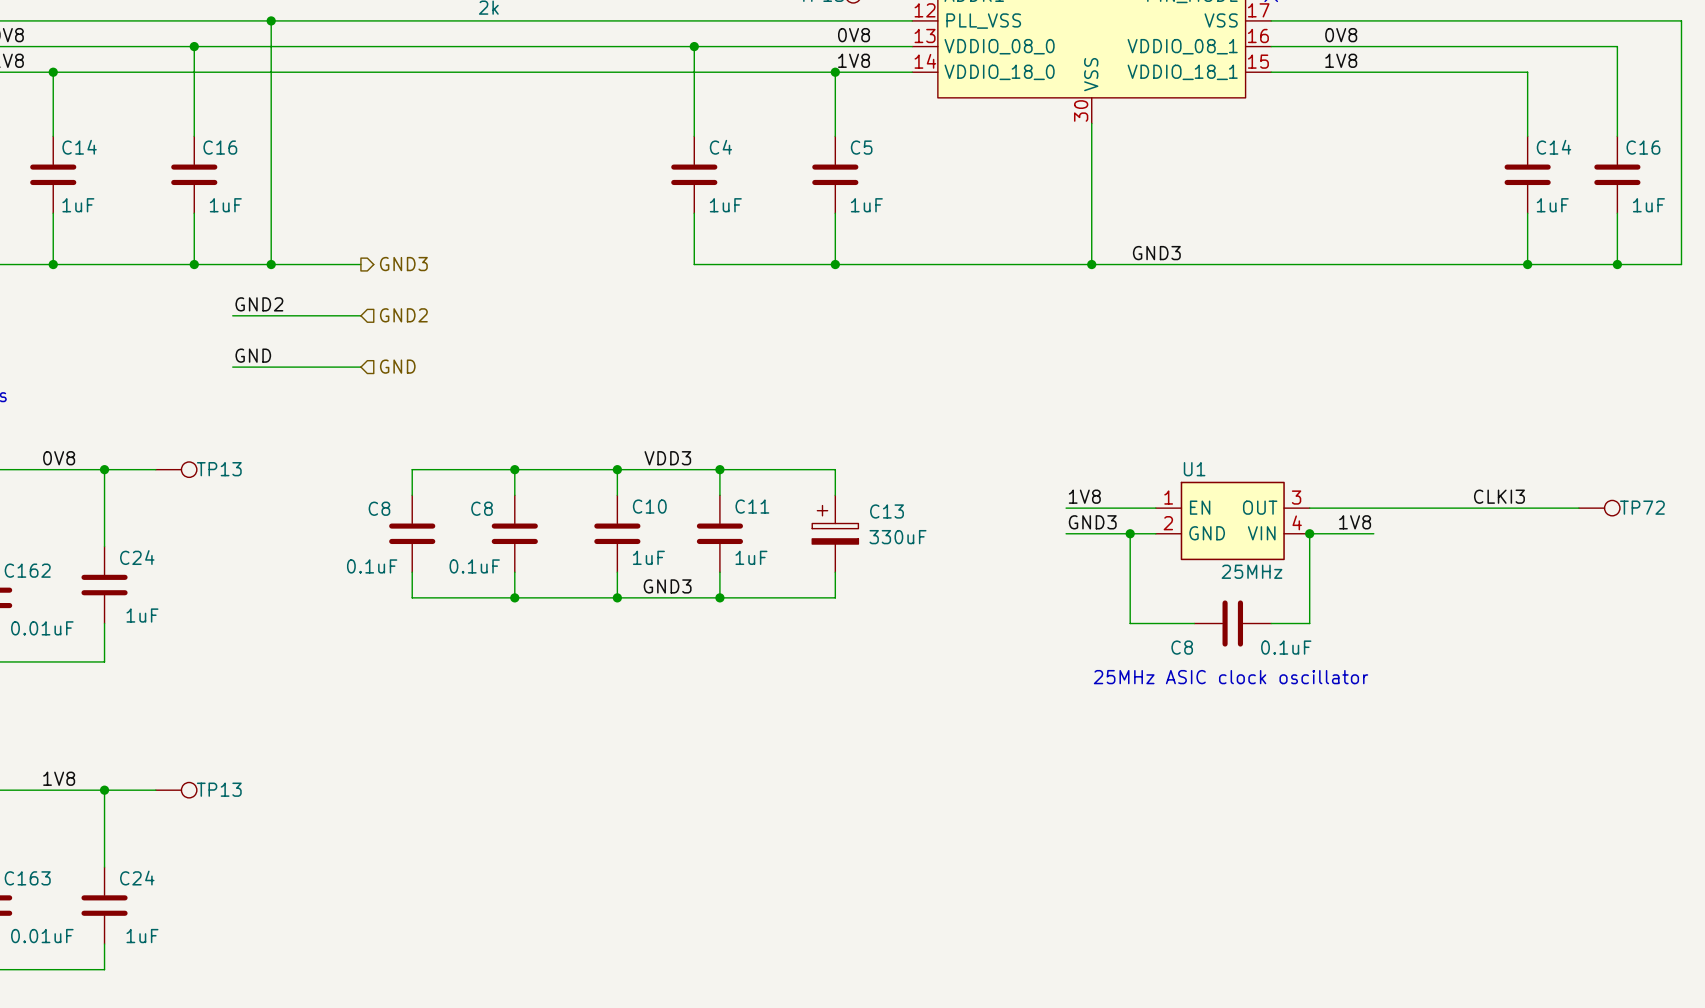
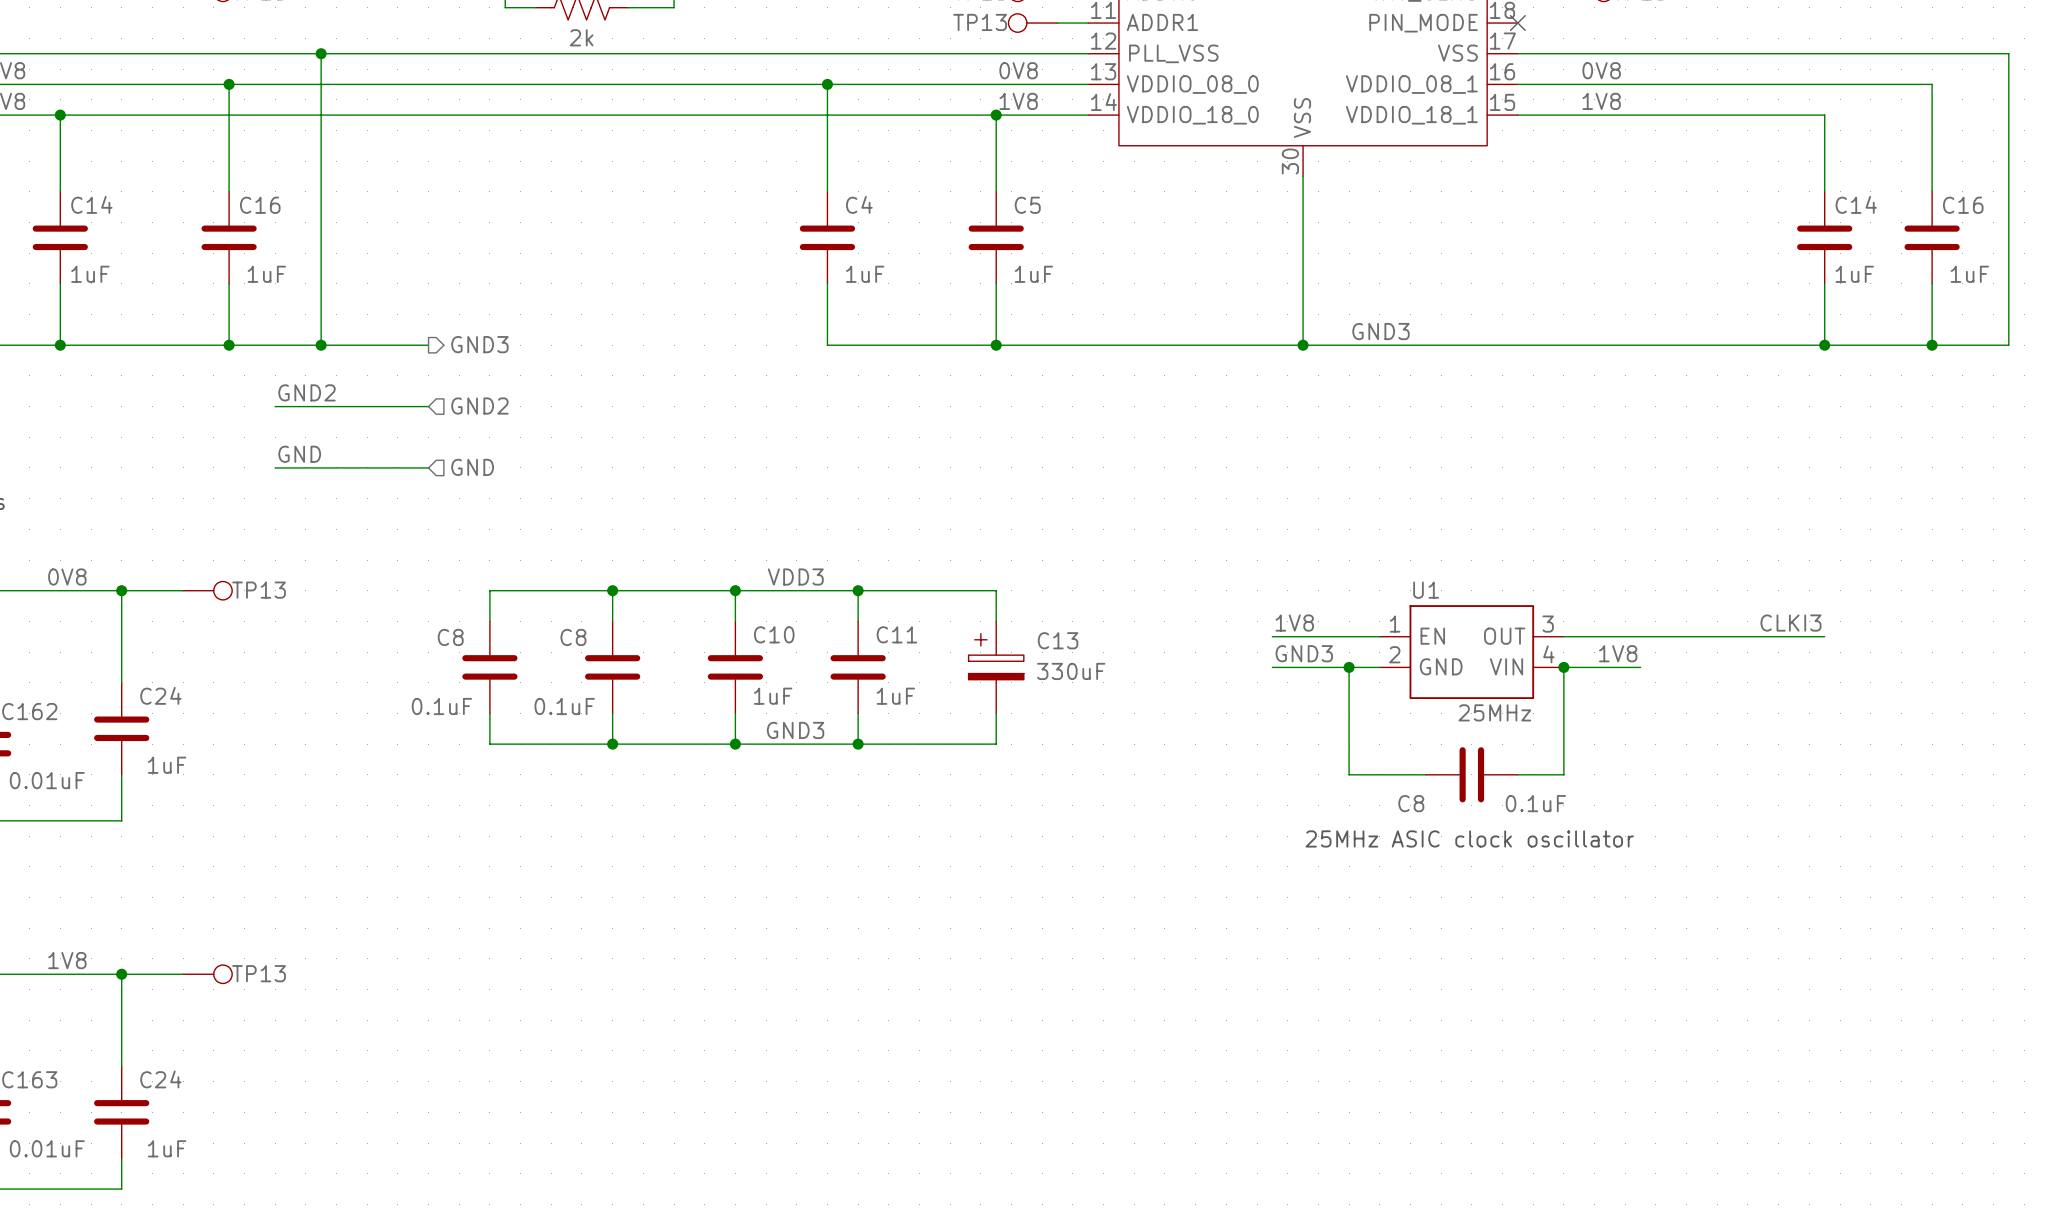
wire: (1527, 508) (1578, 508) -> none
TP72: (1599, 508) -> none

